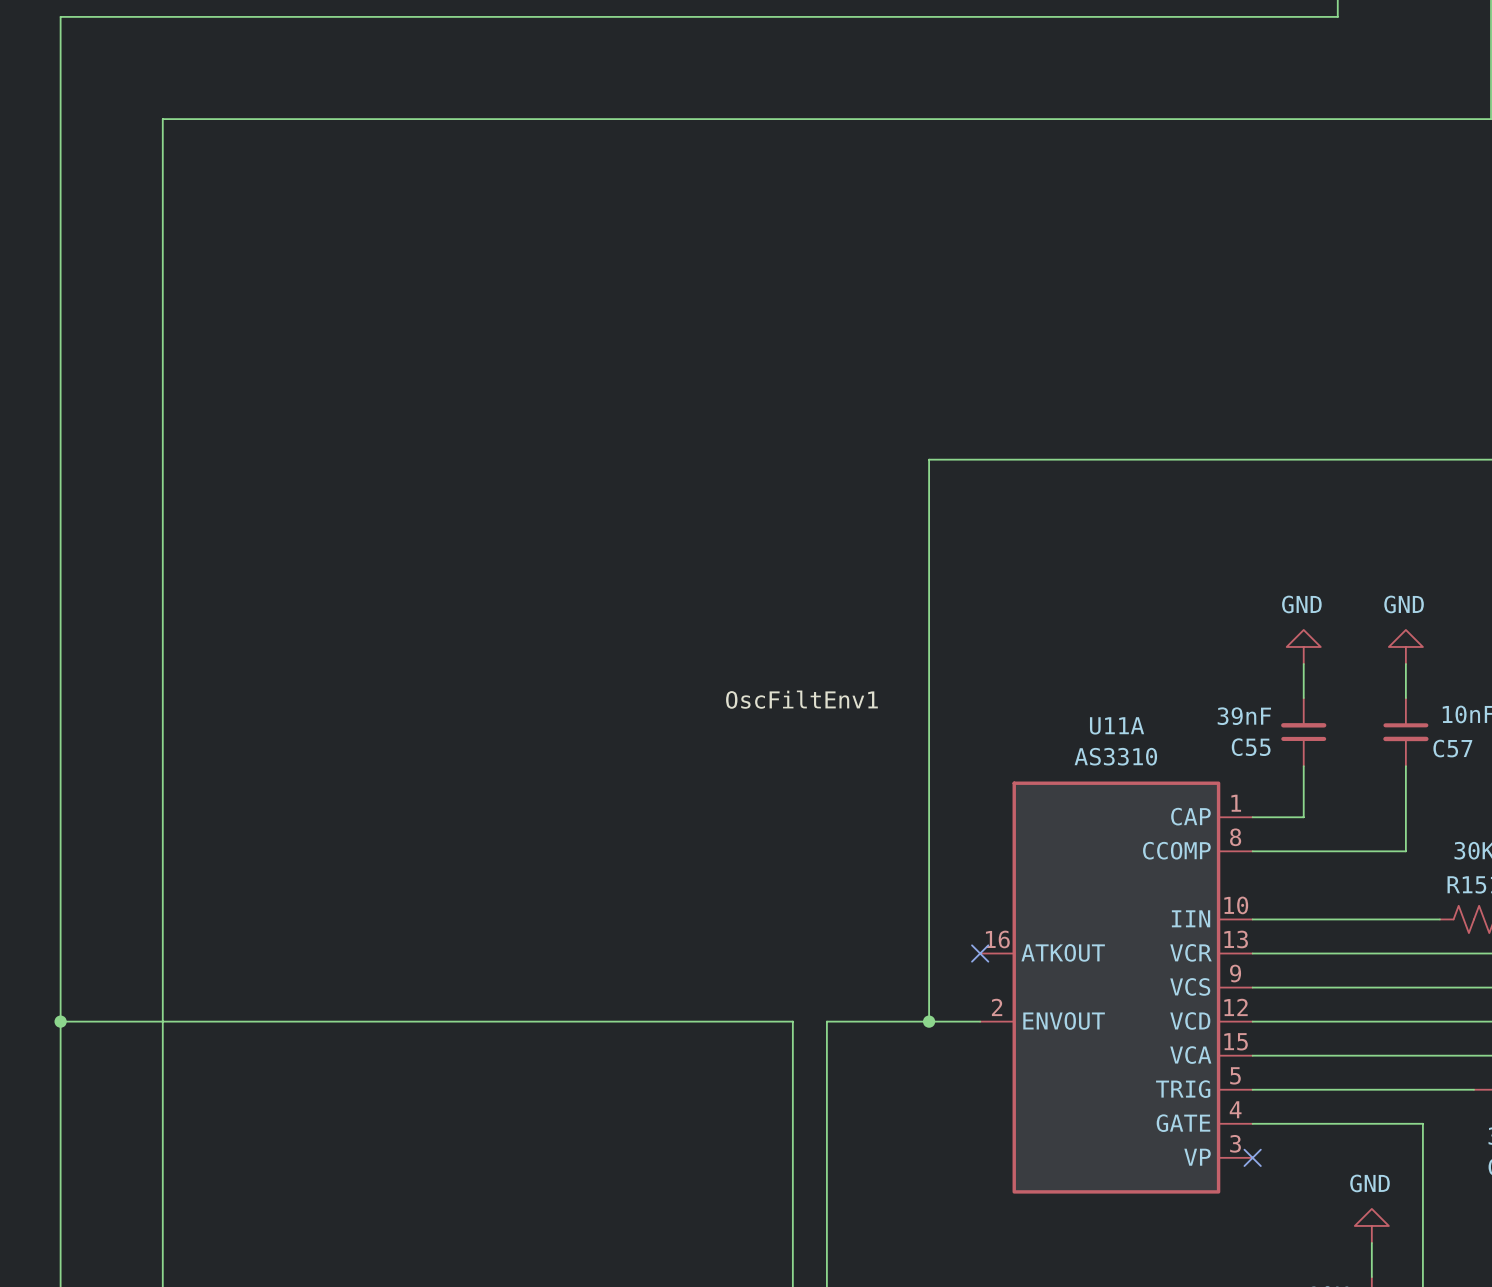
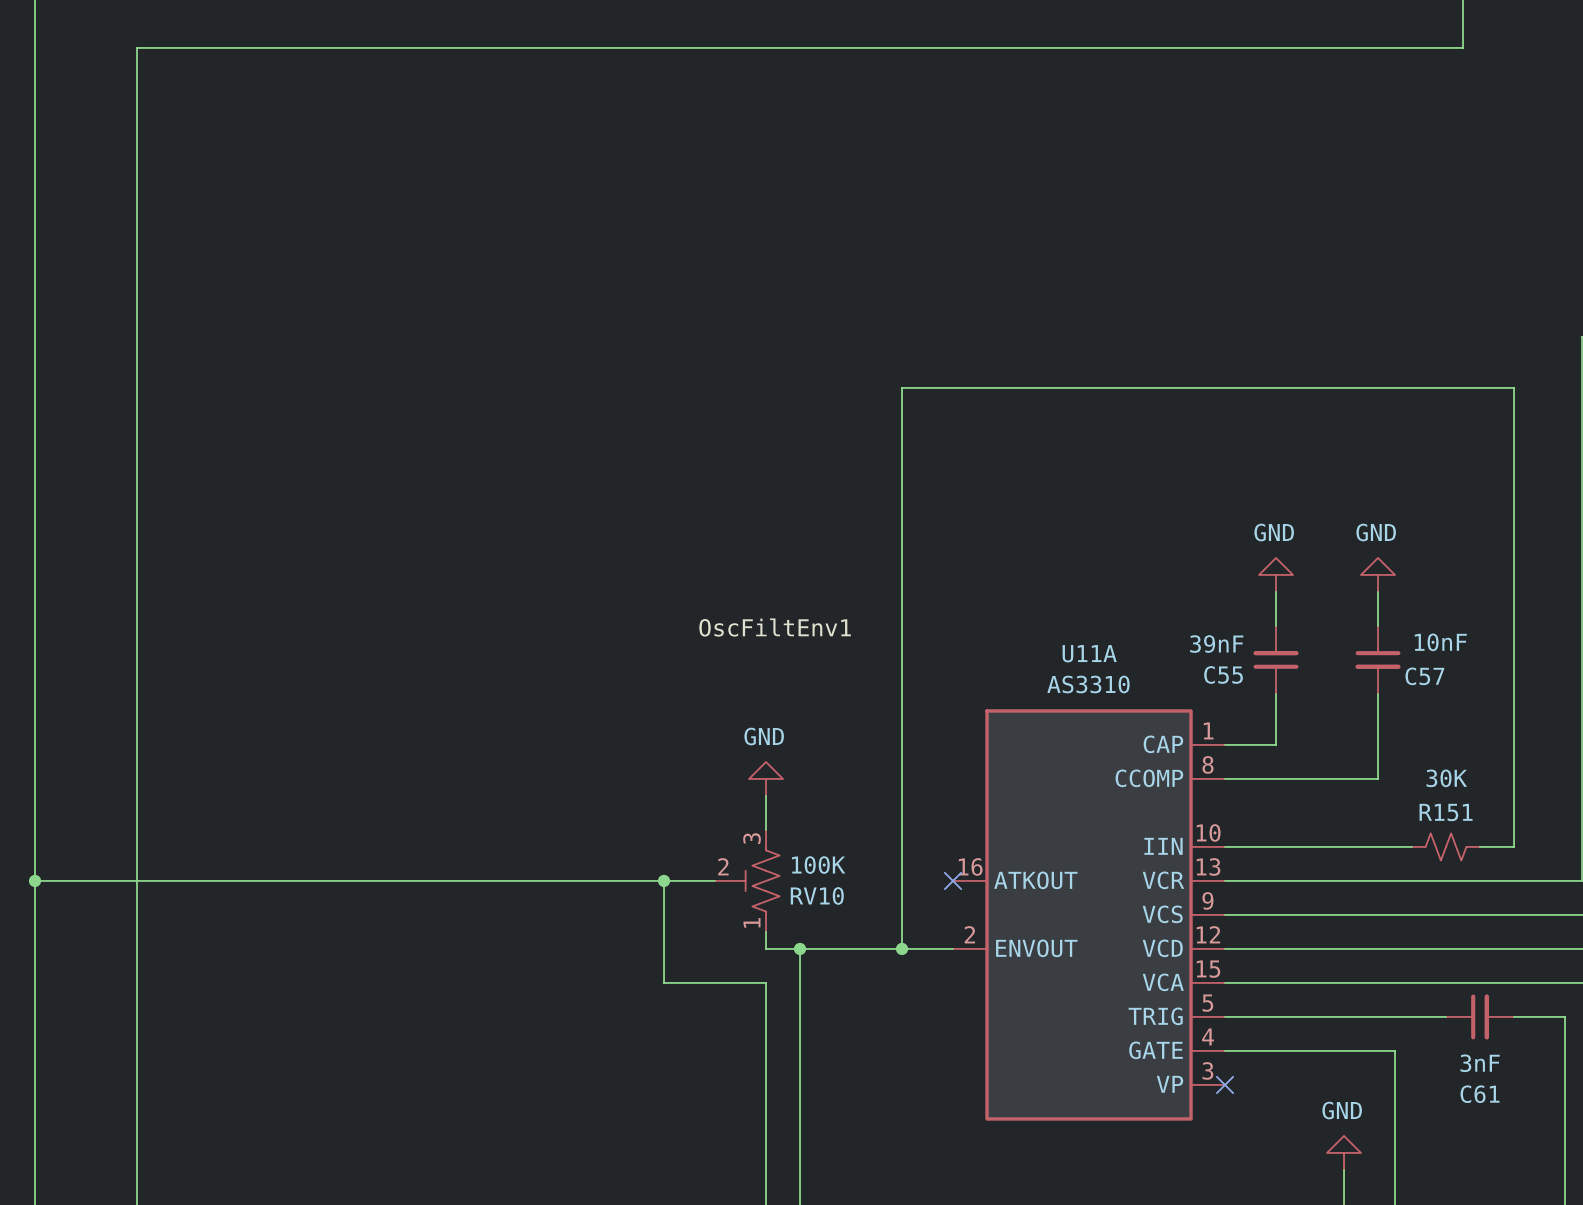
power symbol: none -> GND (766, 778)
wire: none -> (766, 795) (766, 829)
wire: none -> (35, 880) (715, 880)
junction: none -> (664, 880)
RV10: none -> 100K (747, 880)
wire: none -> (766, 931) (766, 948) (800, 948)
wire: (60, 1021) (792, 1021) (792, 1055) -> (664, 880) (664, 982) (766, 982)
junction position: (60, 1021) -> (35, 880)
junction: none -> (800, 948)

